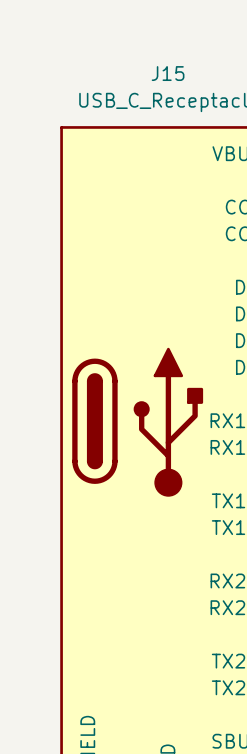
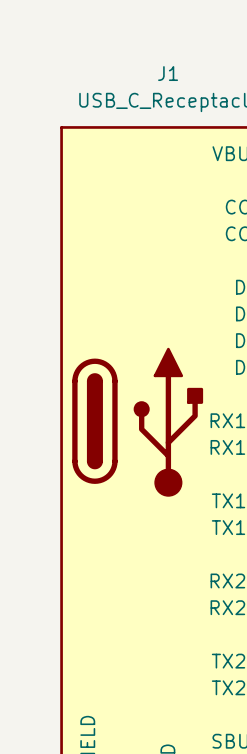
J15 name: J15 (168, 73) -> J1 (168, 73)

